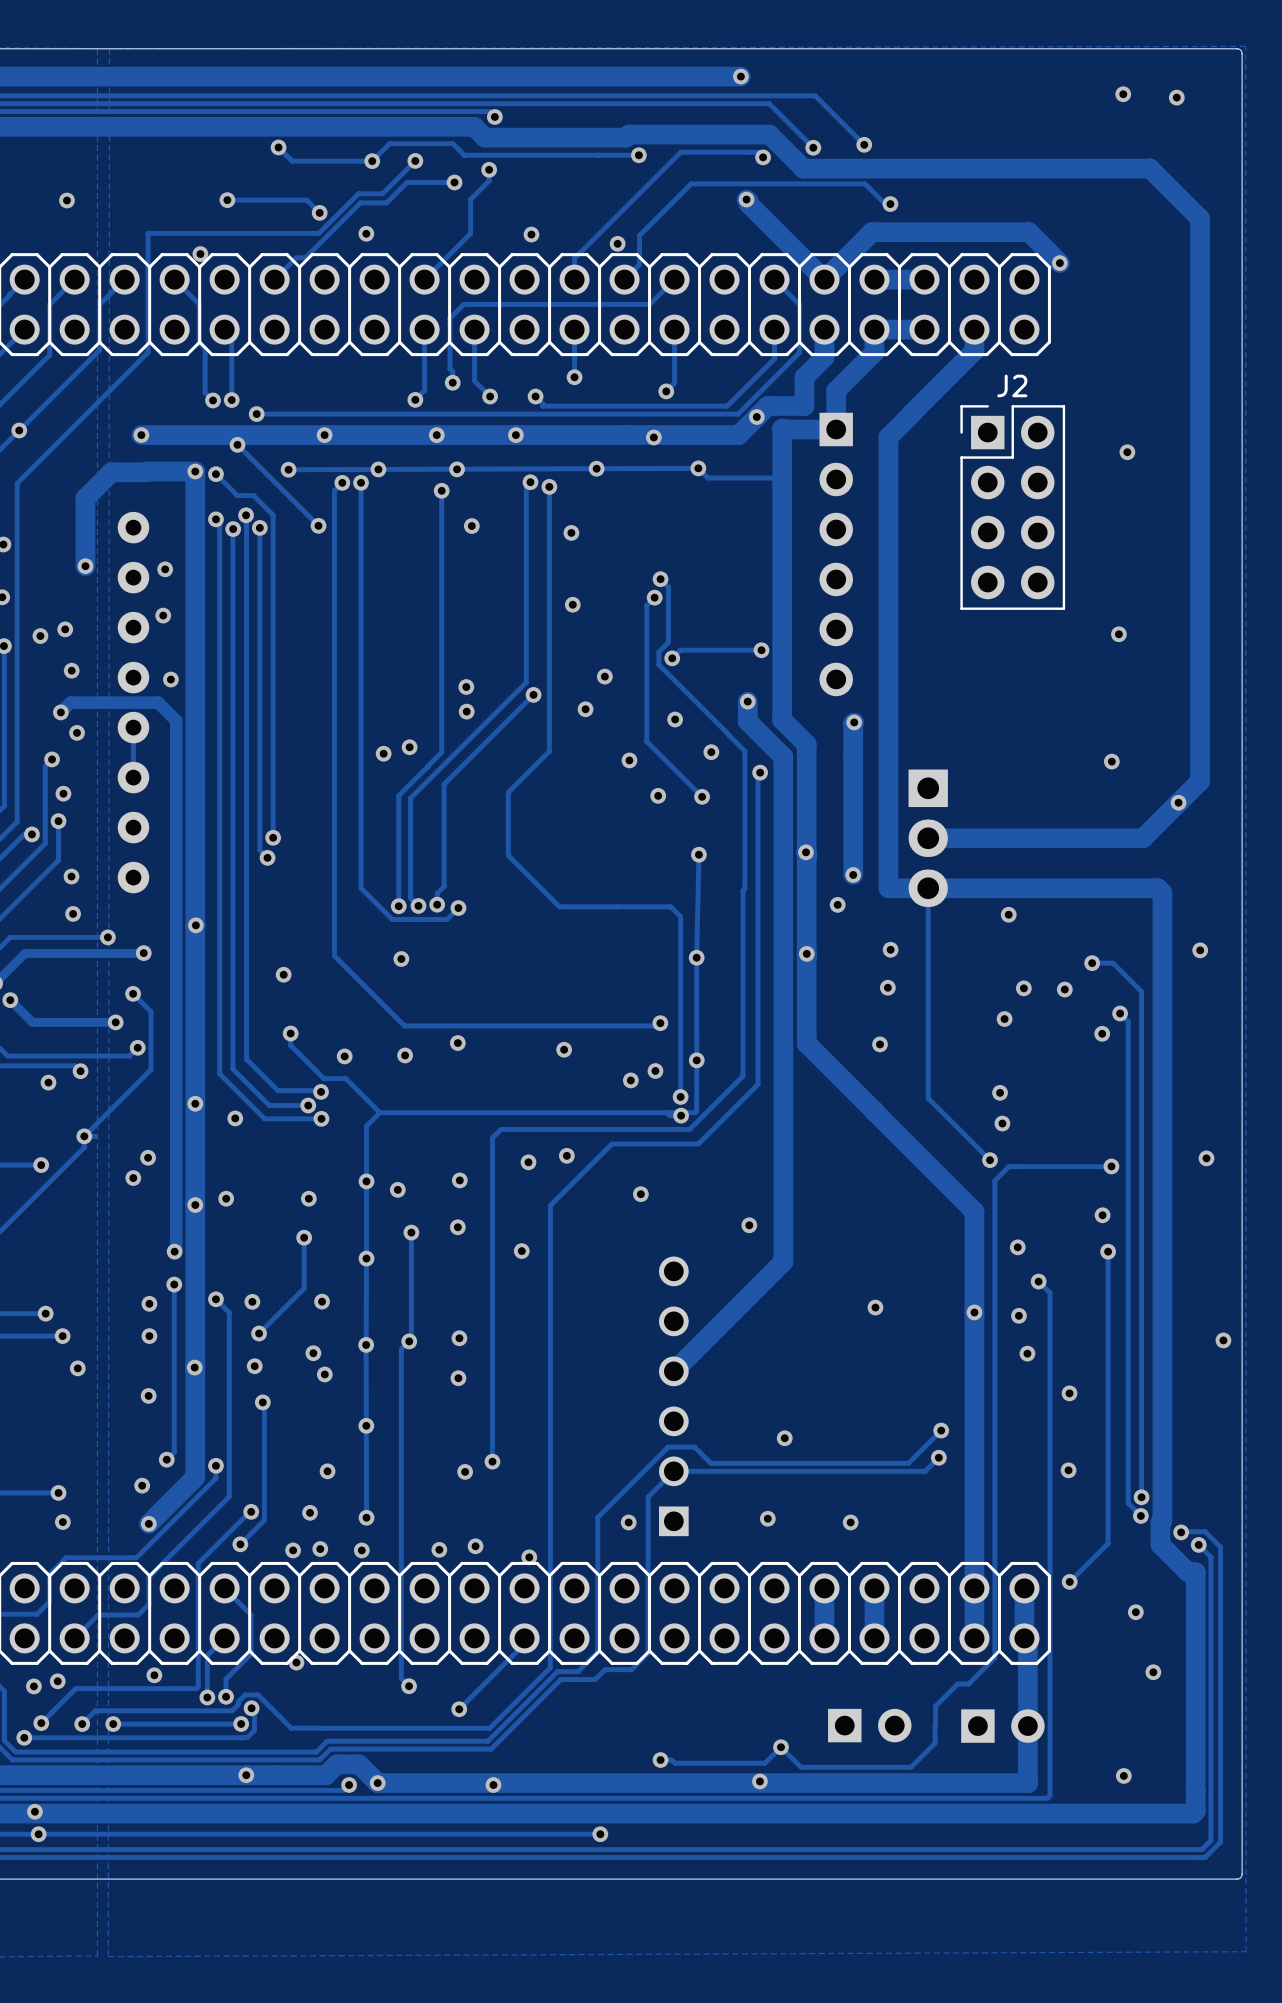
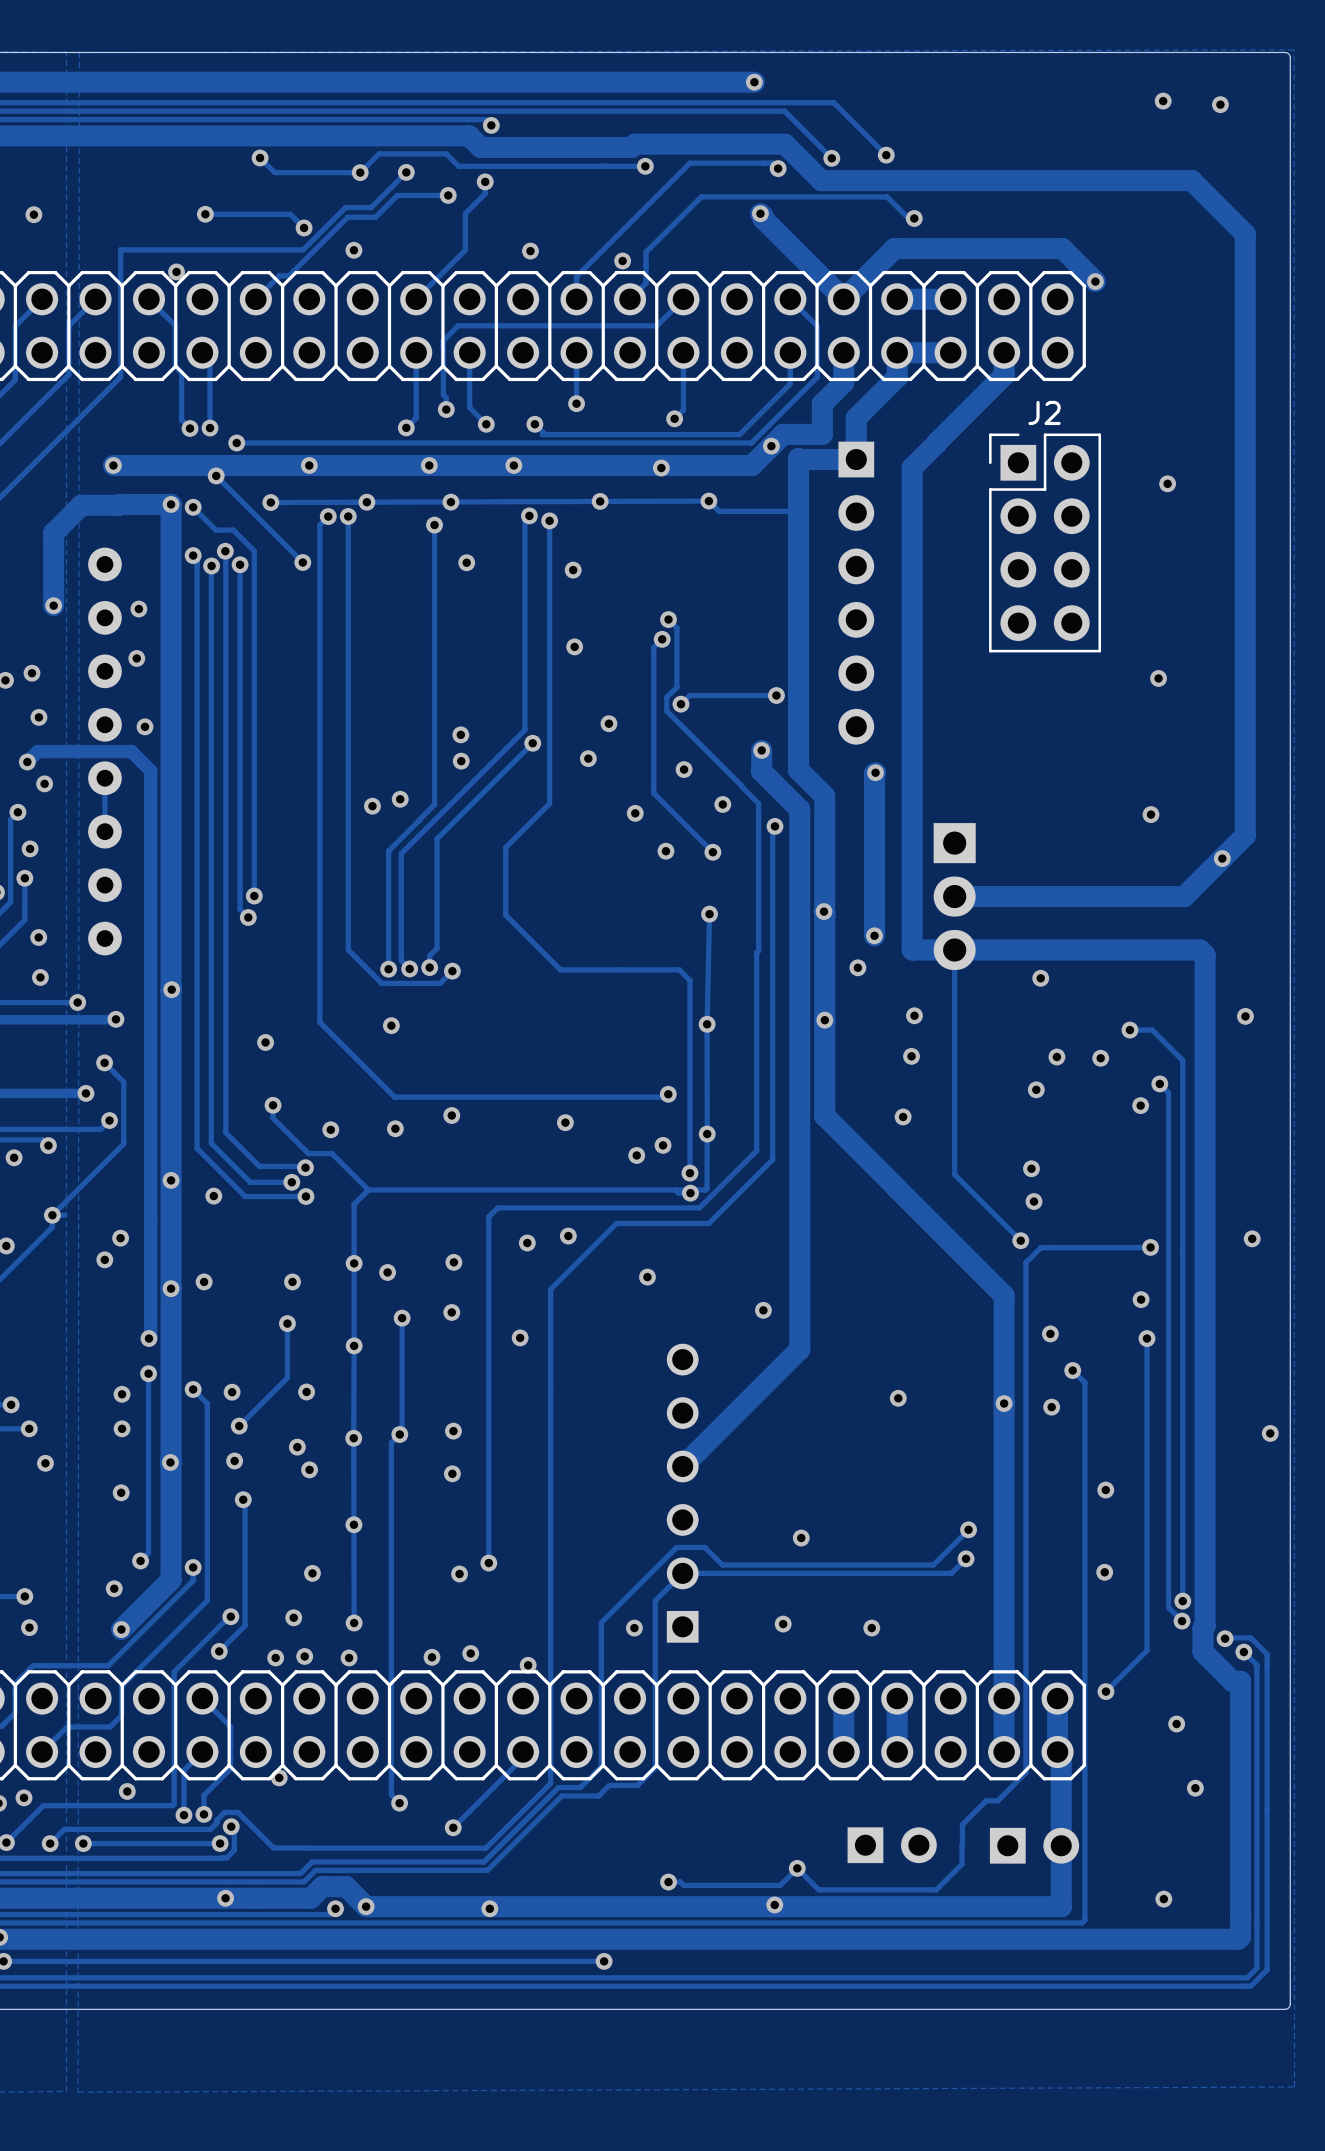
via: (1027, 1353) -> none

